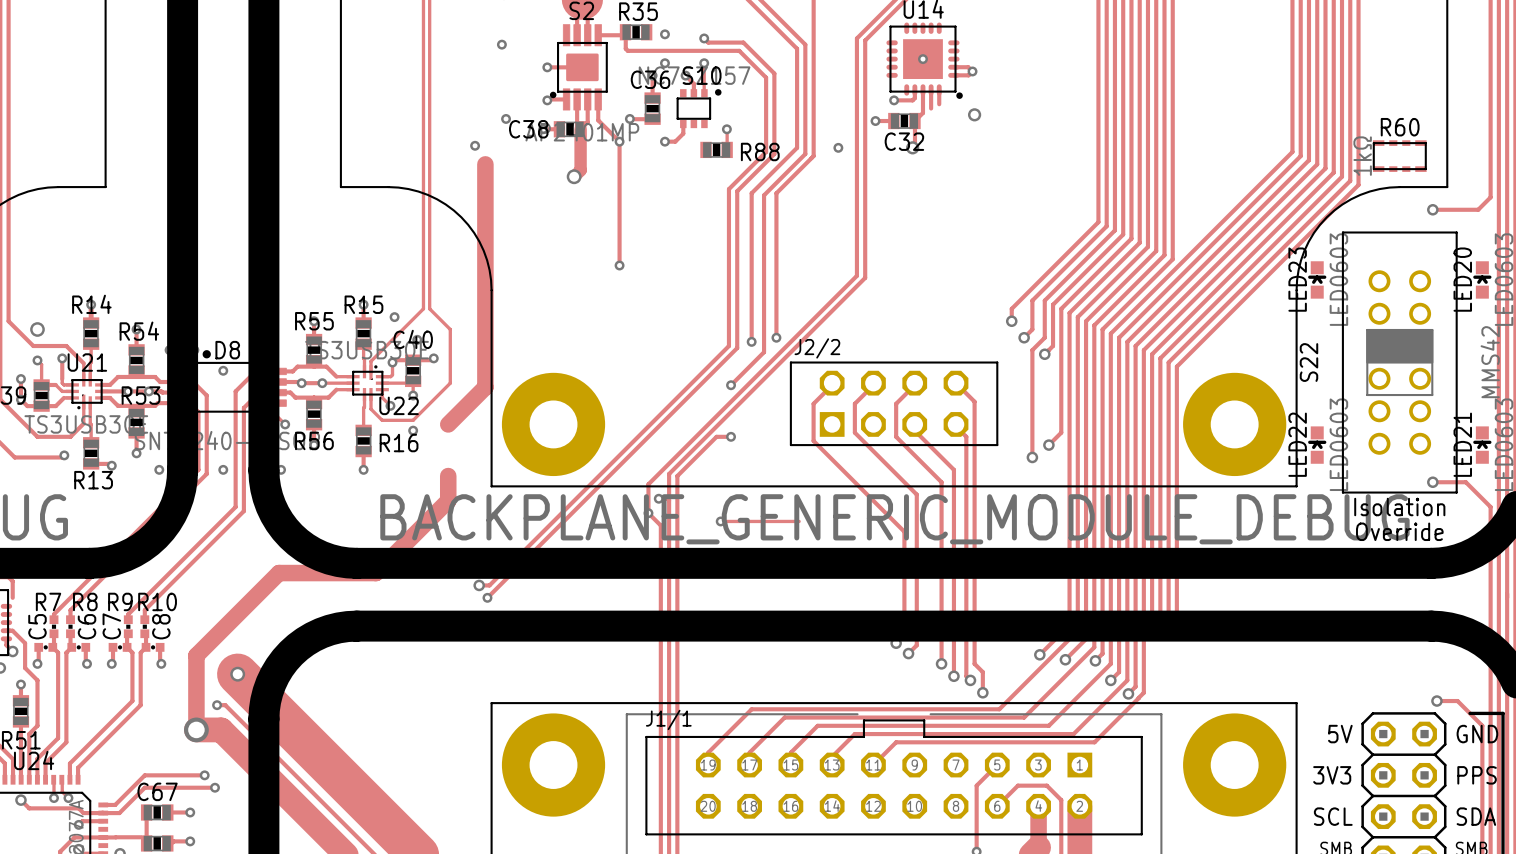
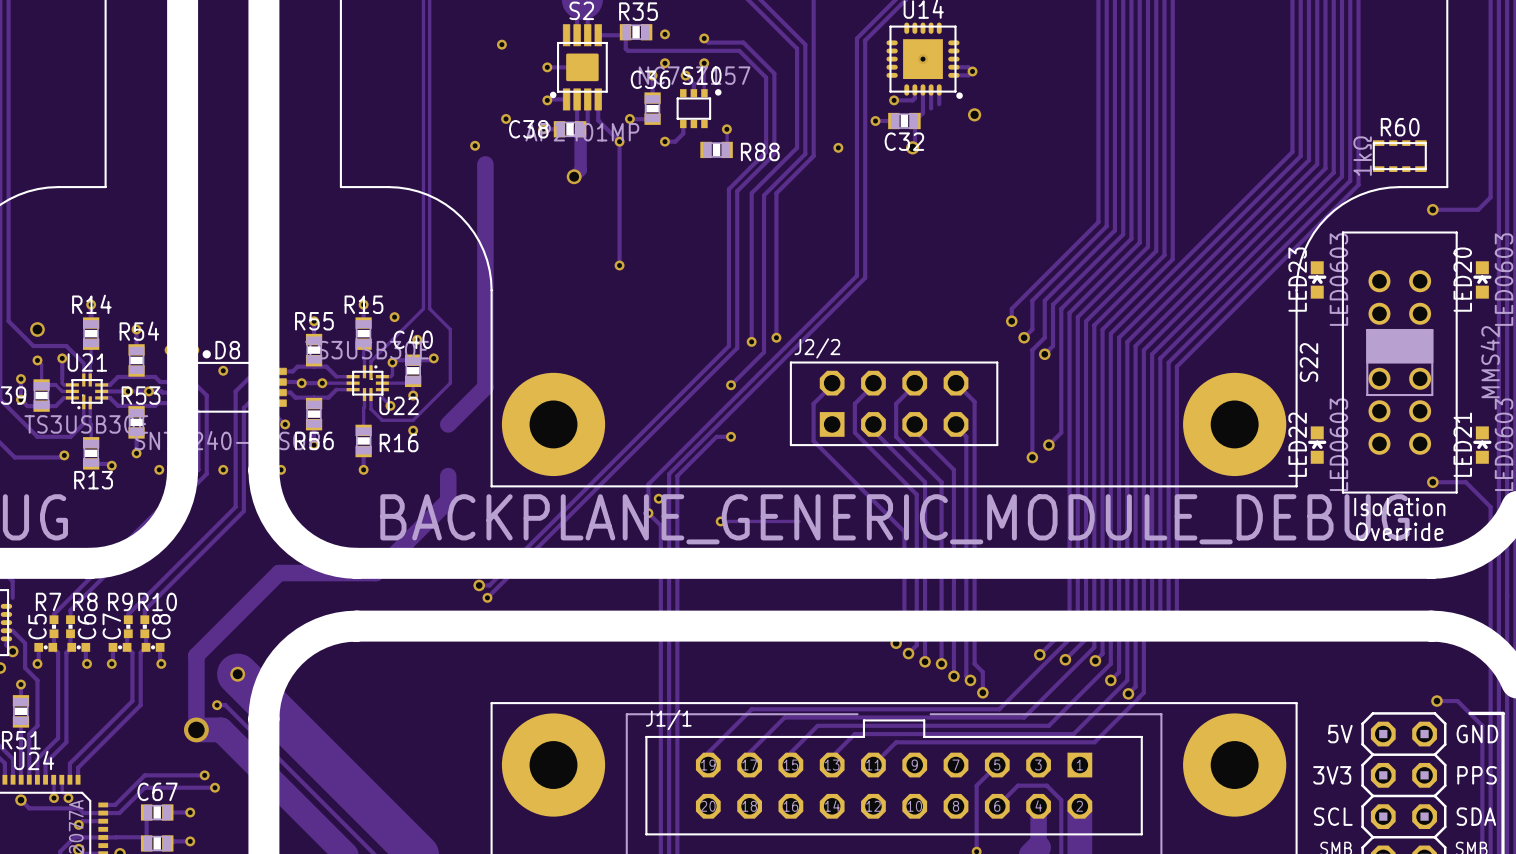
track: none -> (873, 424) (873, 430) (925, 482) (925, 661)
via: none -> (925, 661)

